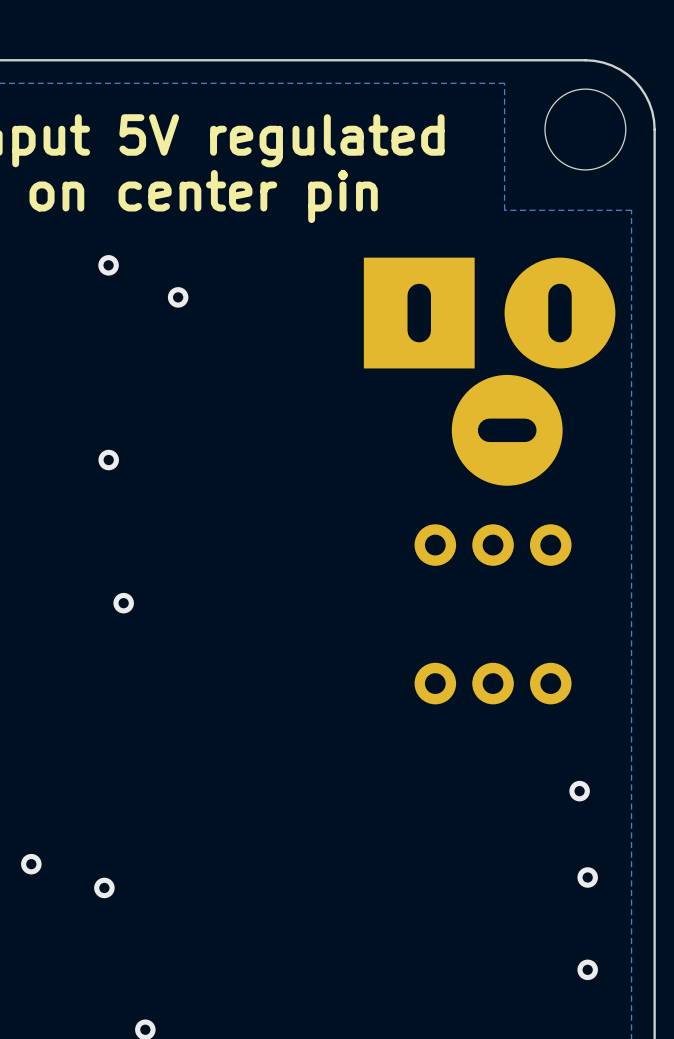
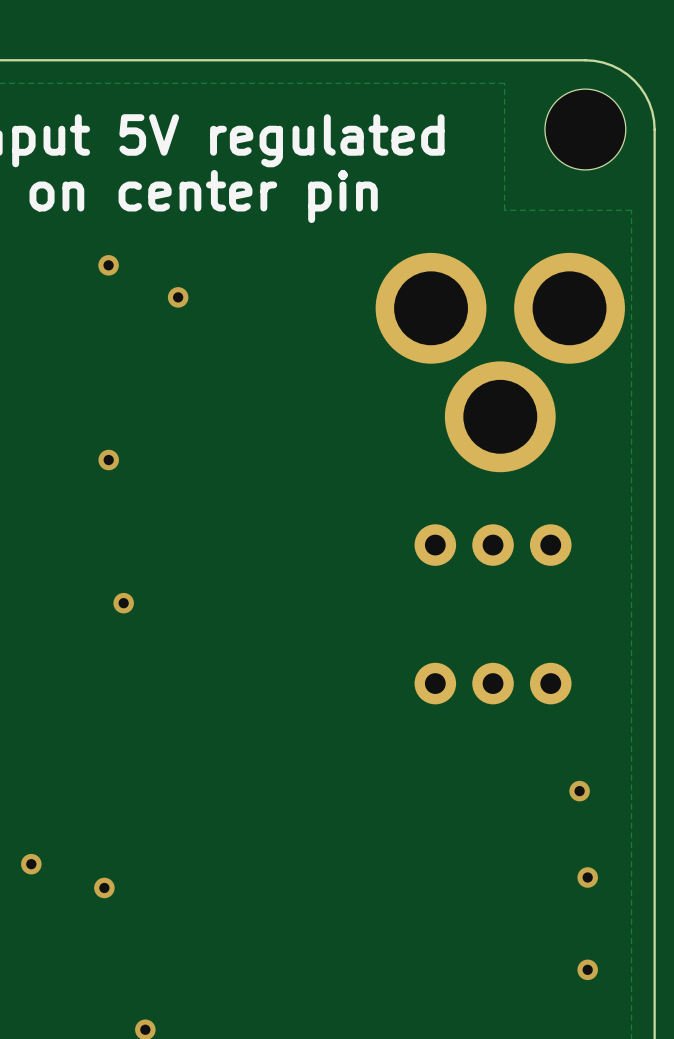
part footprint: [363, 257, 616, 486] -> [375, 252, 625, 473]

